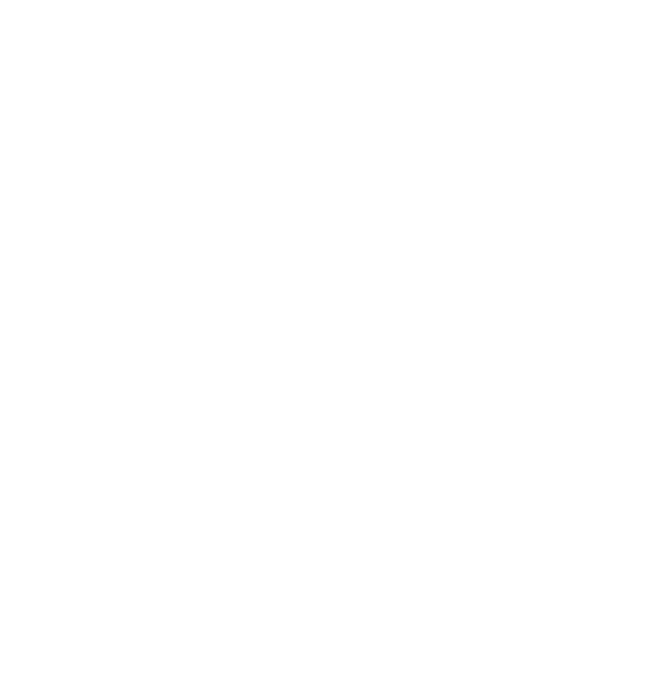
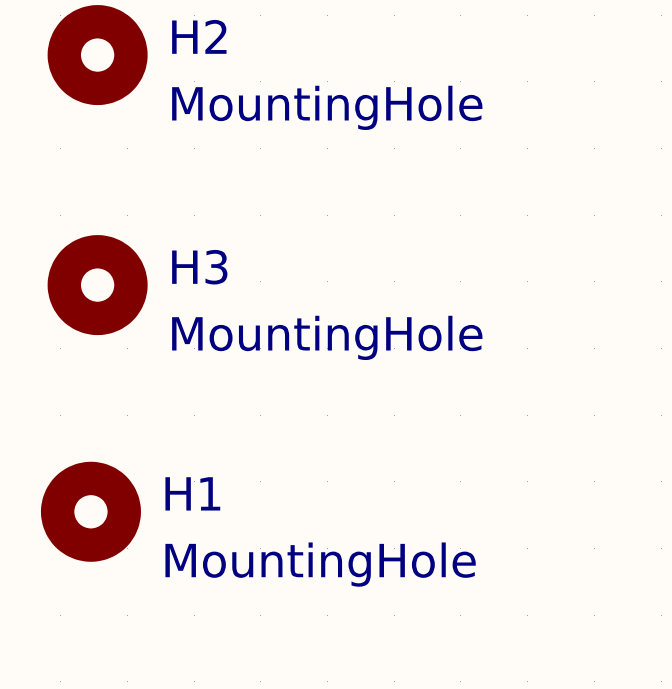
H2: none -> MountingHole (97, 55)
H3: none -> MountingHole (97, 285)
H1: none -> MountingHole (90, 511)

